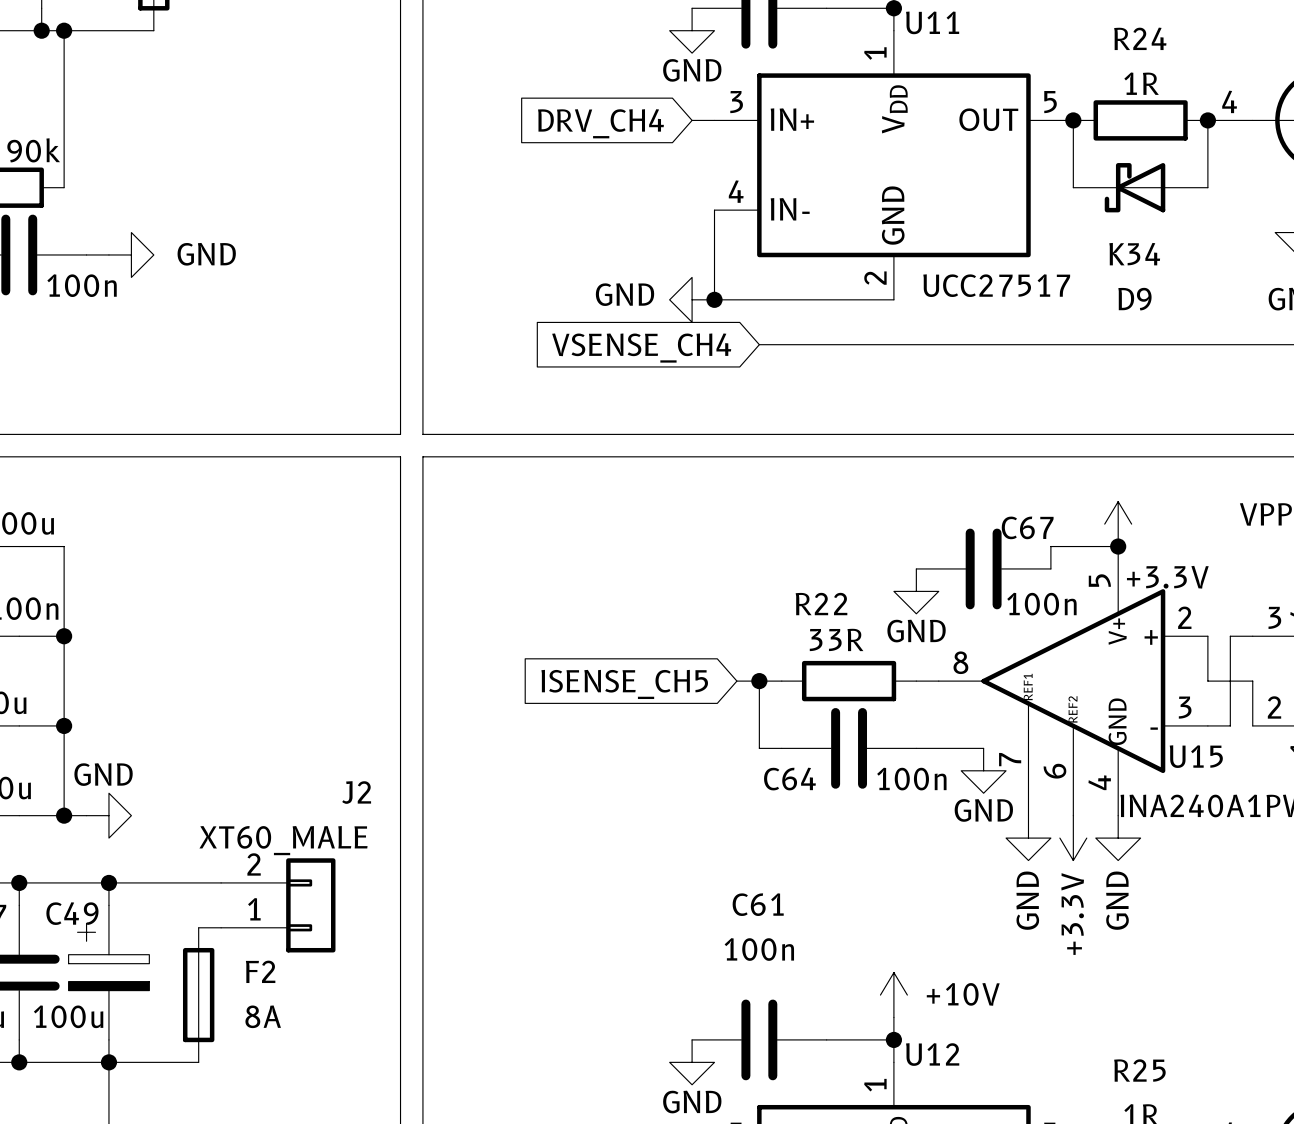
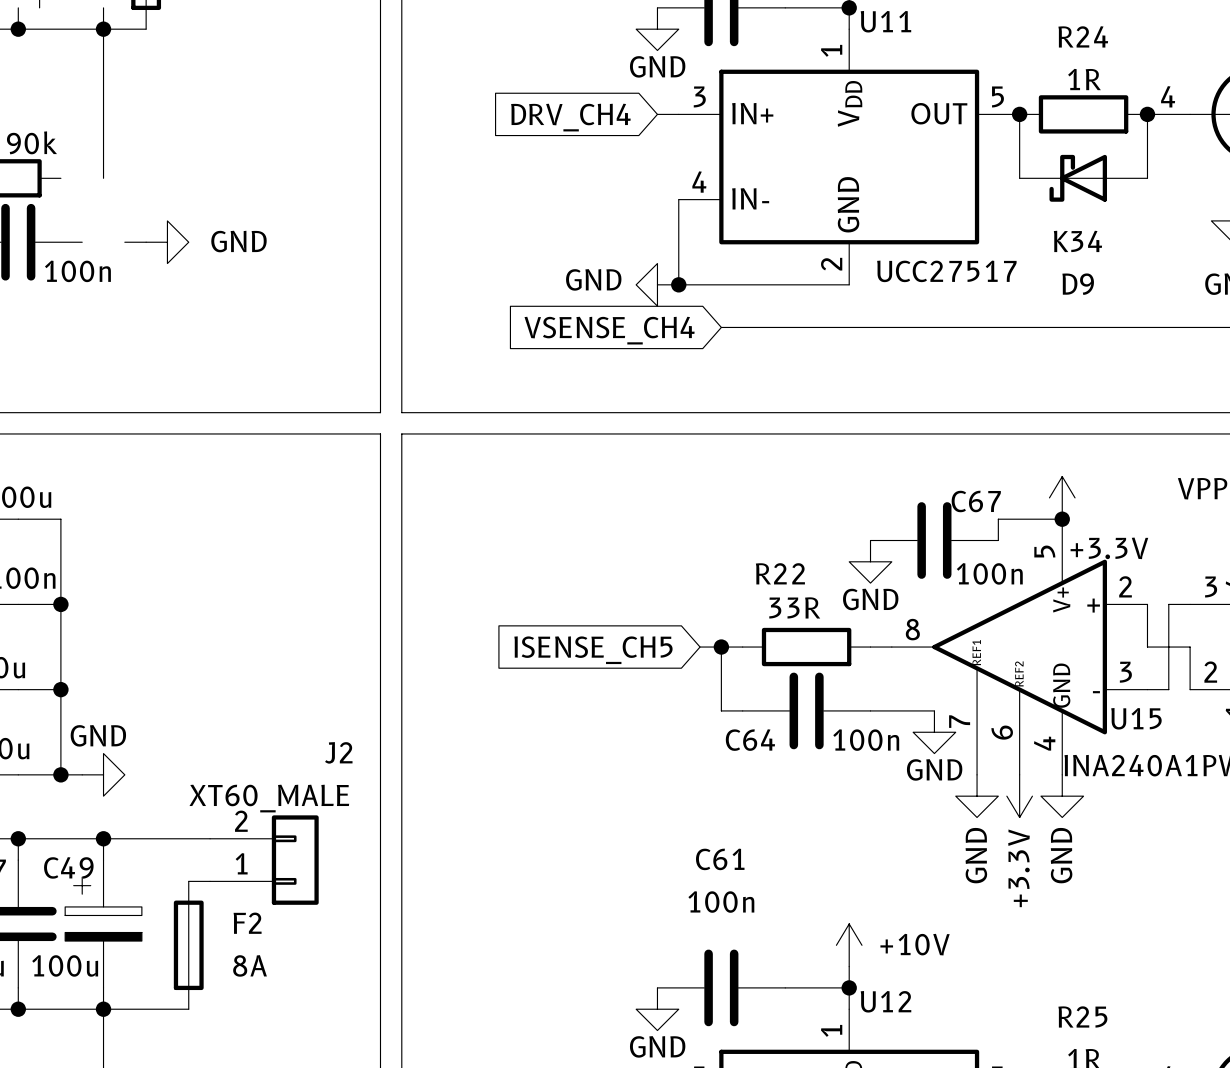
wire: (41, 8) (41, 30) -> (18, 7) (18, 29)
wire: none -> (103, 7) (103, 178)
junction: none -> (18, 29)
junction: (41, 30) -> none
wire: (64, 30) (64, 187) -> none
junction: (64, 30) -> none
junction: none -> (103, 29)
wire: (86, 254) (108, 254) -> (124, 242) (146, 242)
power symbol position: GND (131, 254) -> GND (167, 242)

